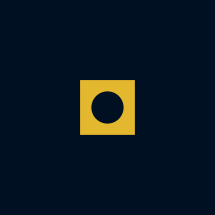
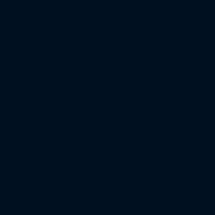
part: (107, 107) -> none

